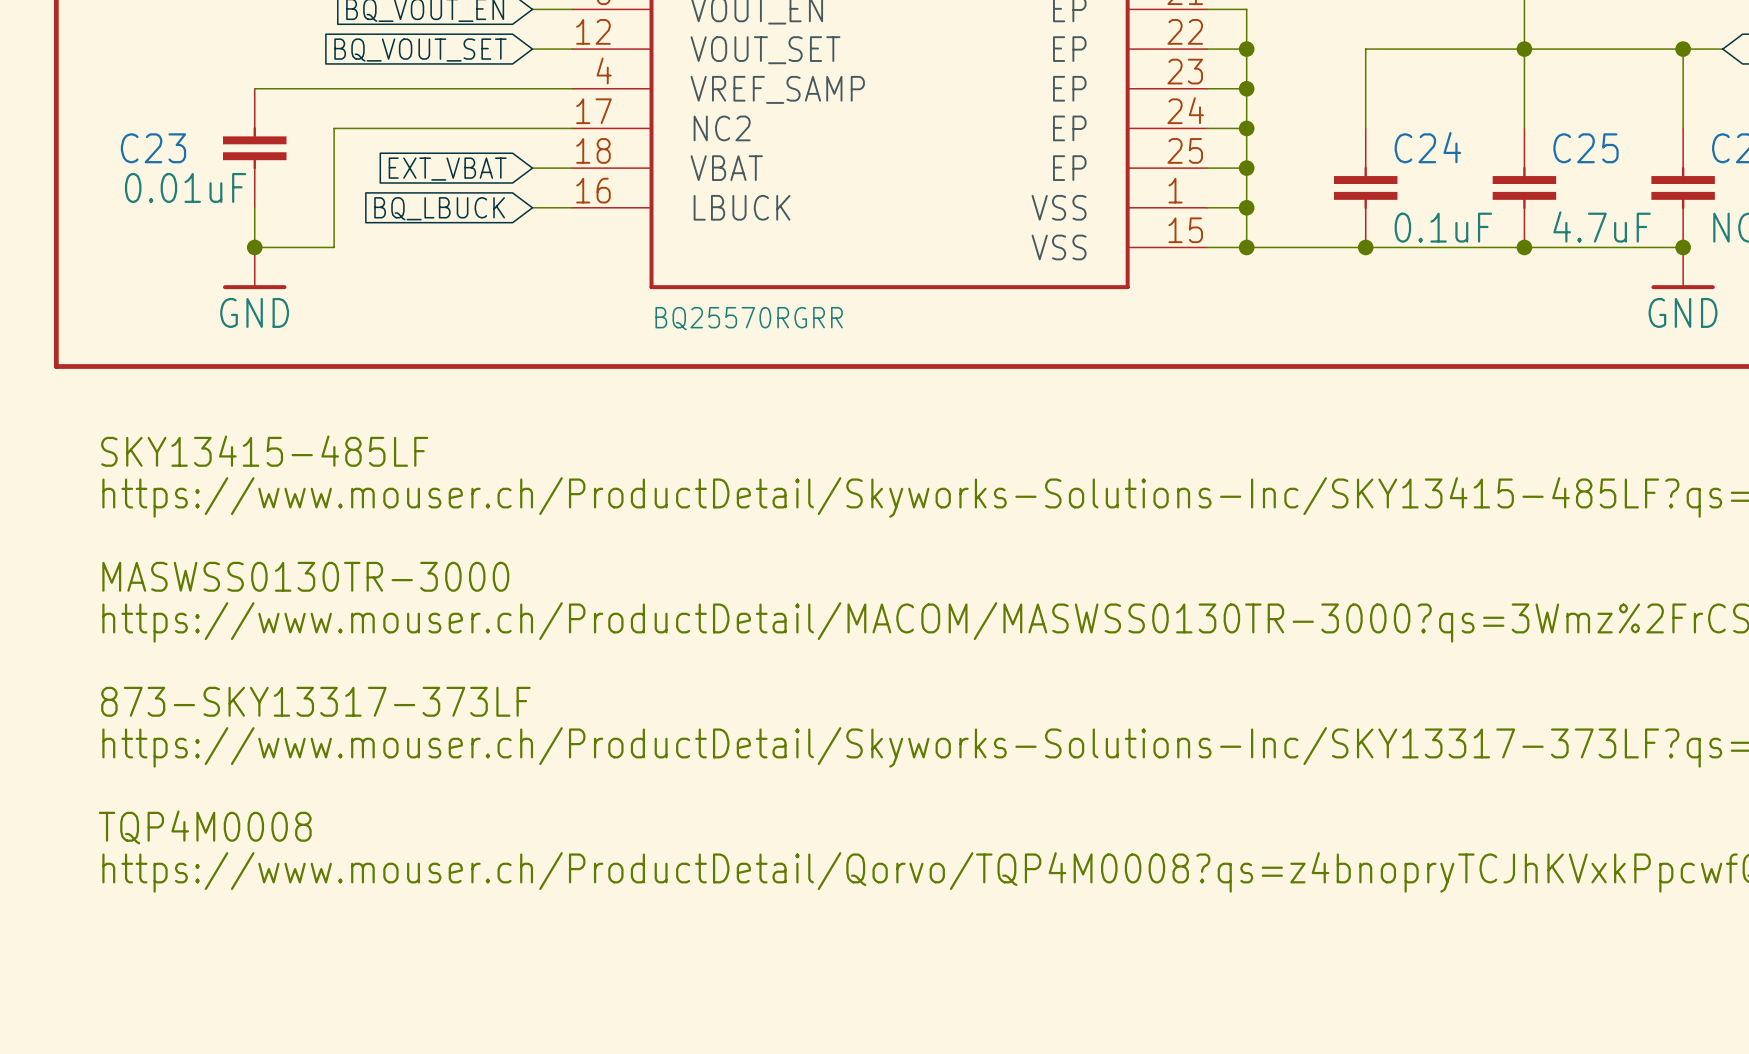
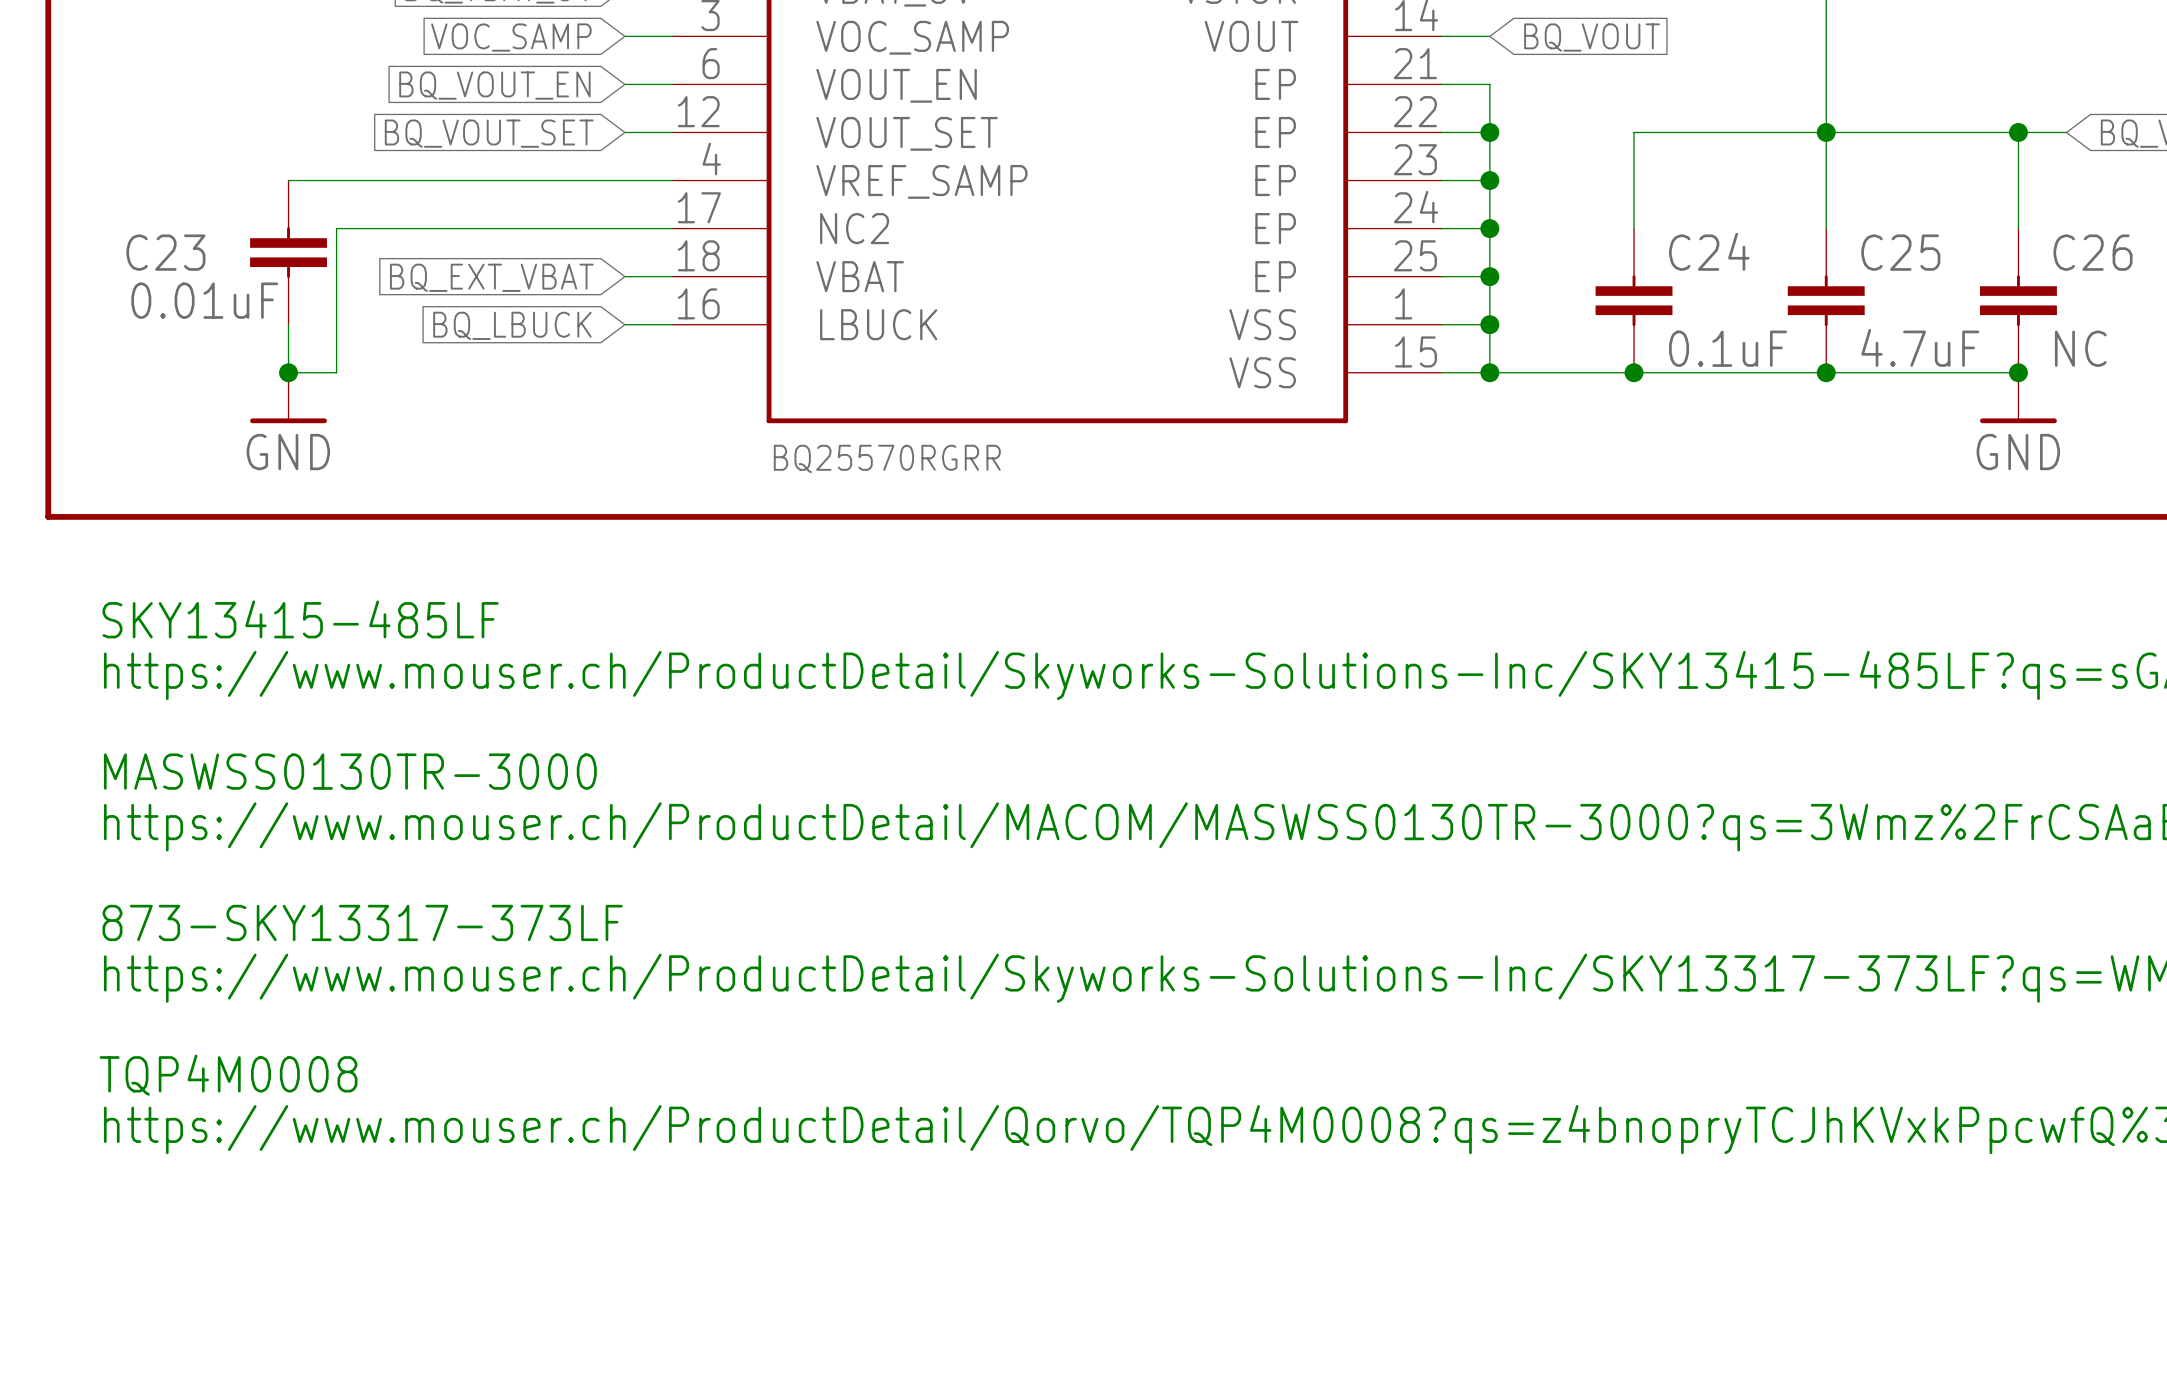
wire: (334, 128) (334, 247) (294, 247) -> (384, 228) (336, 228) (336, 372)
global label: EXT_VBAT (447, 169) -> BQ_EXT_VBAT (491, 277)

